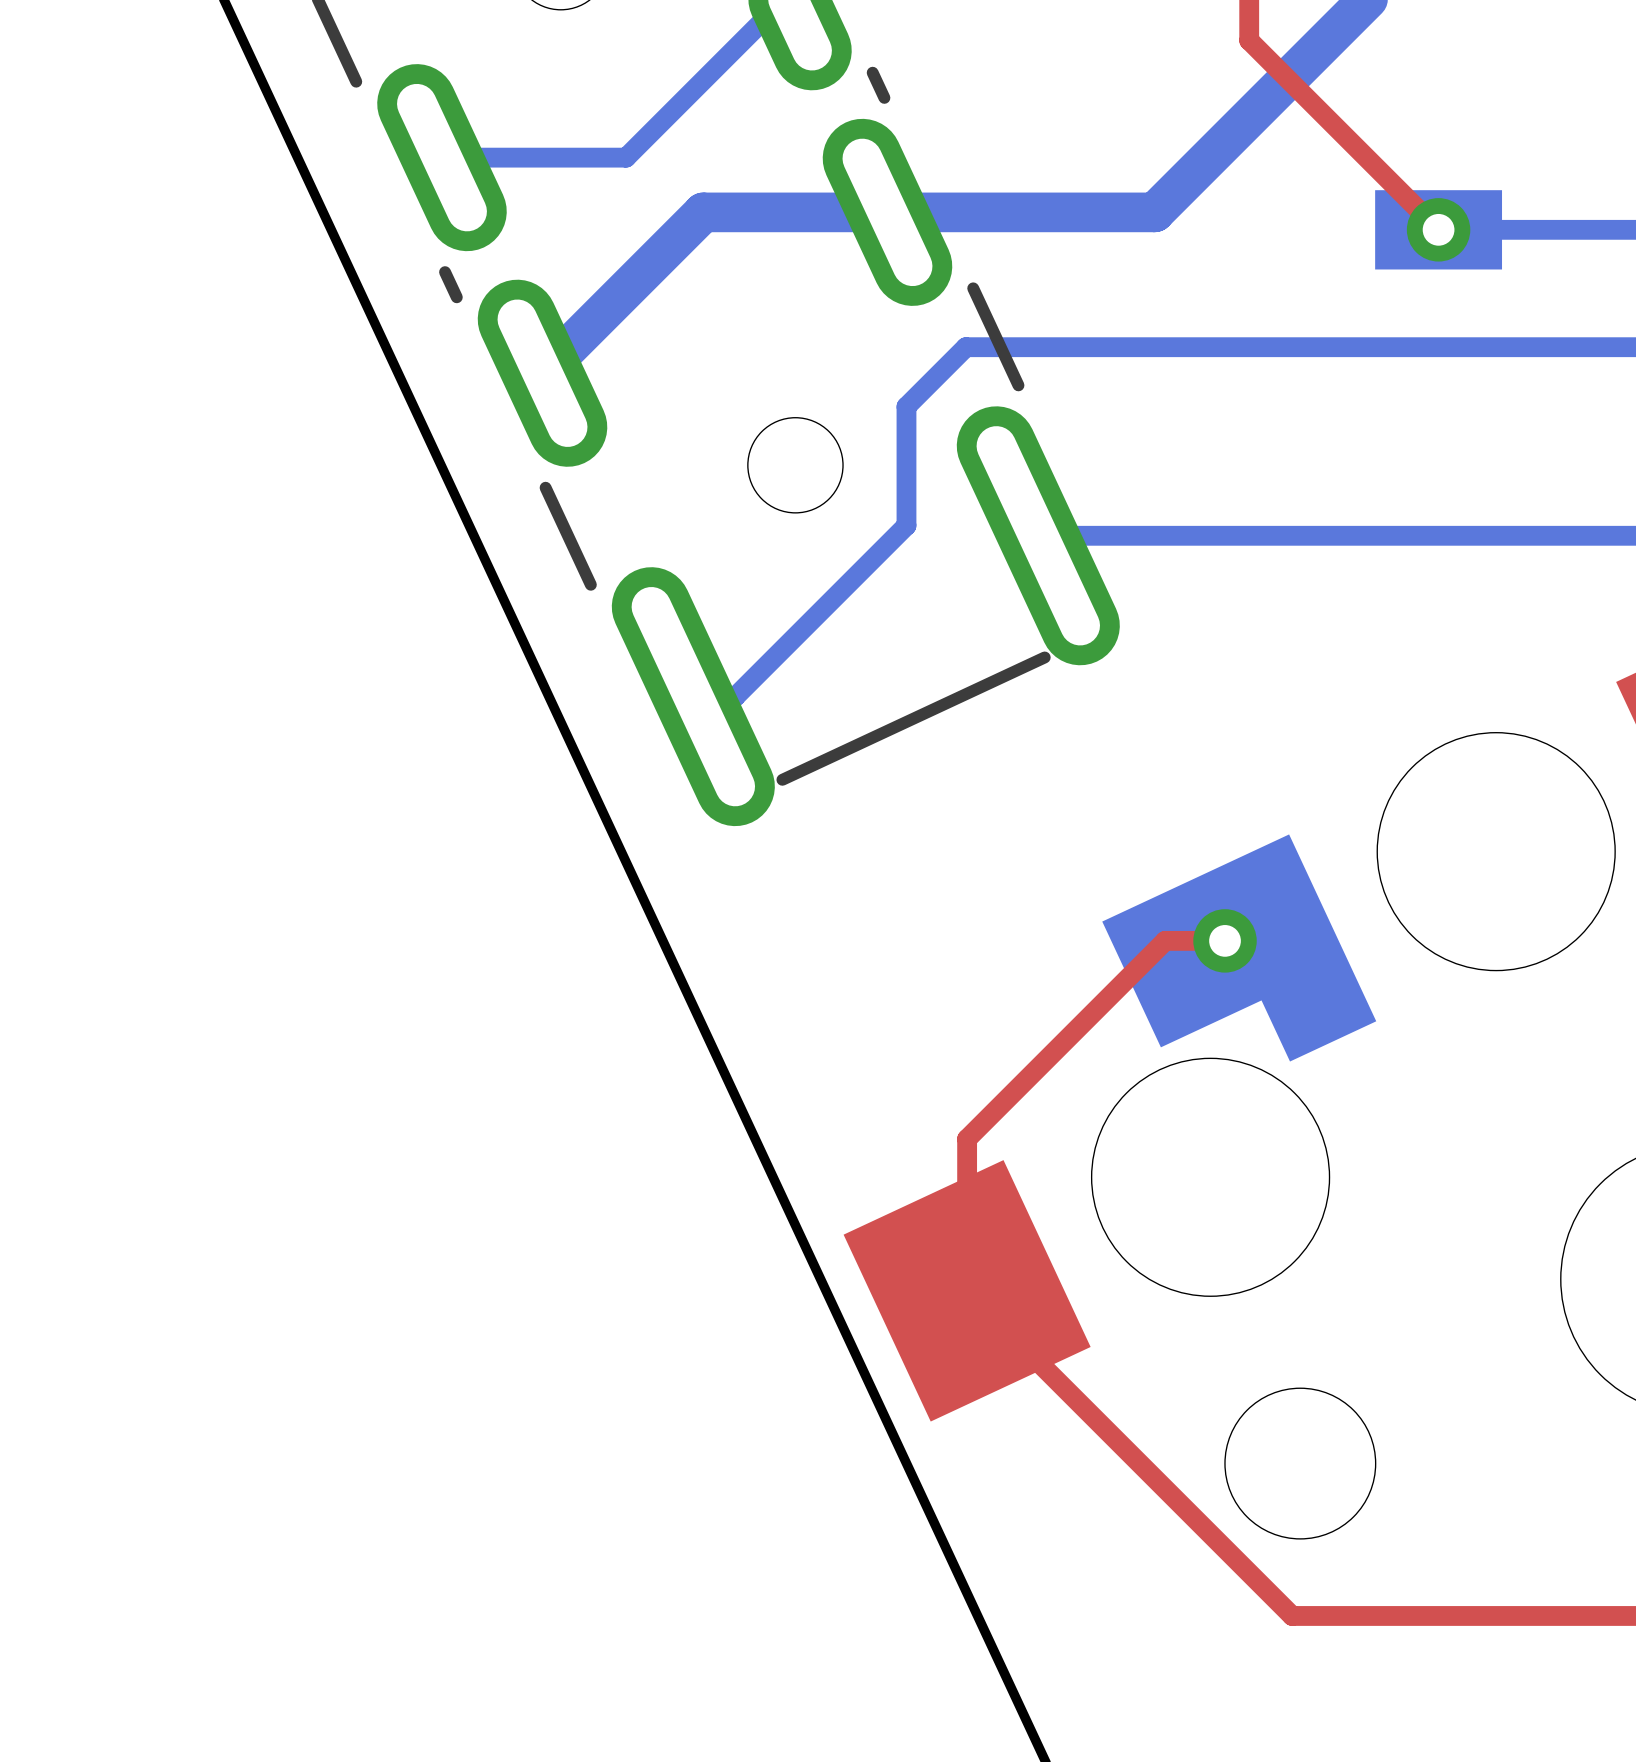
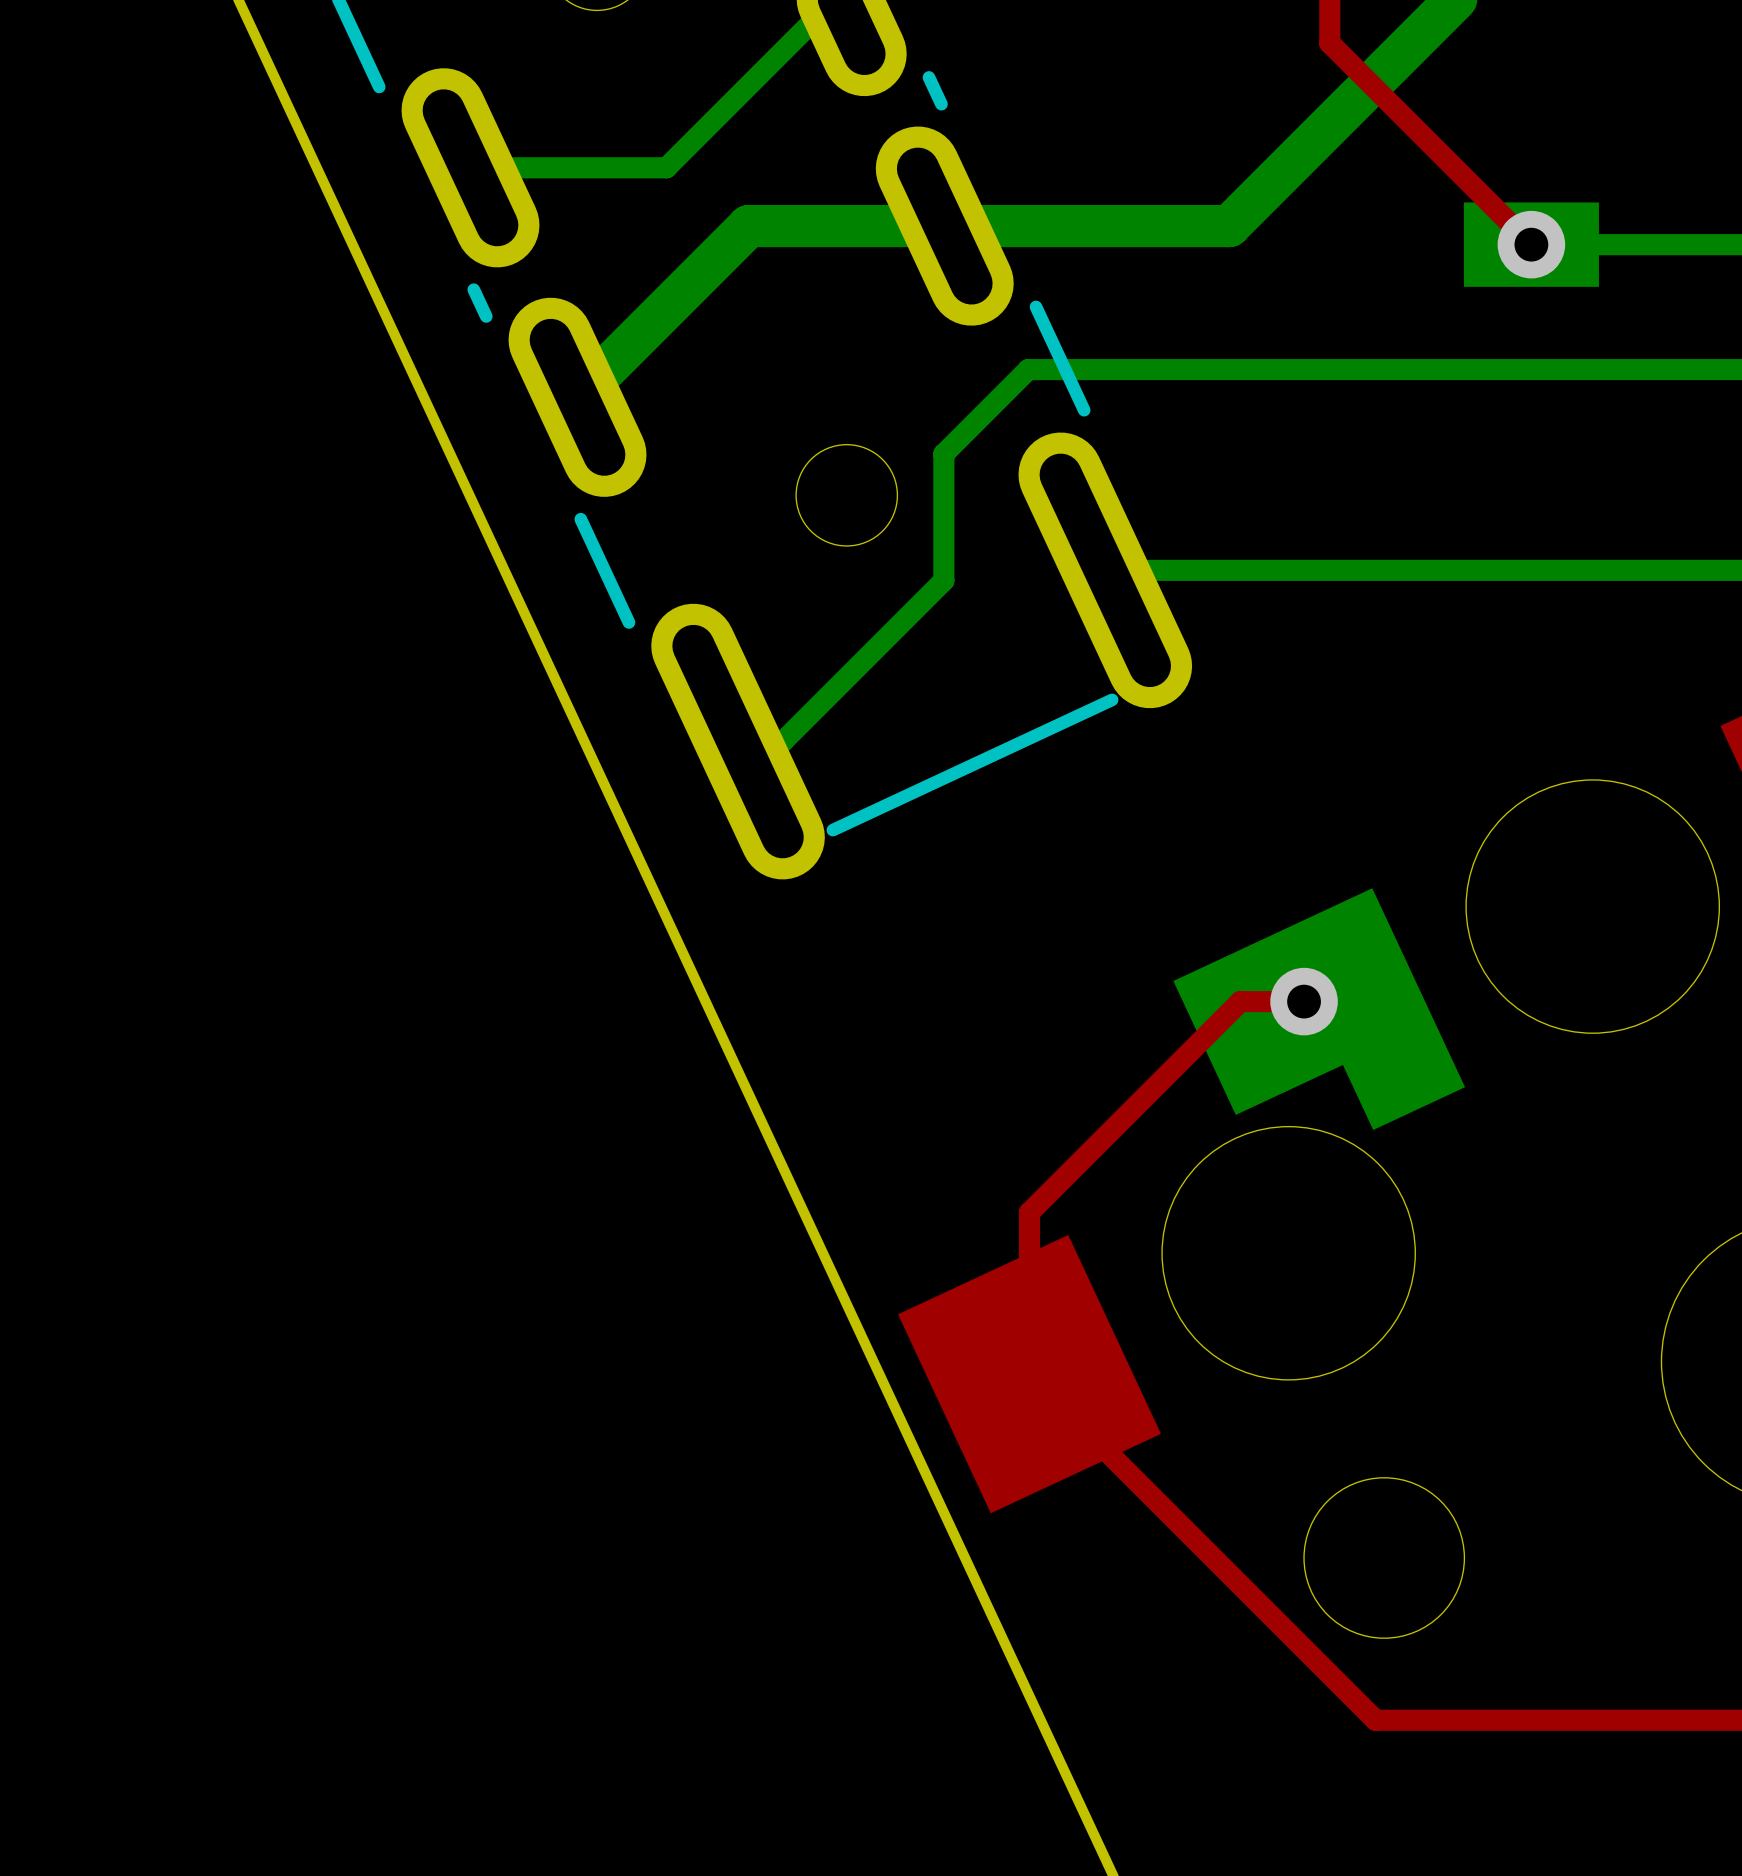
bottom track: (906, 406) (906, 525) (886, 545) -> (964, 432) (943, 454) (943, 580)

